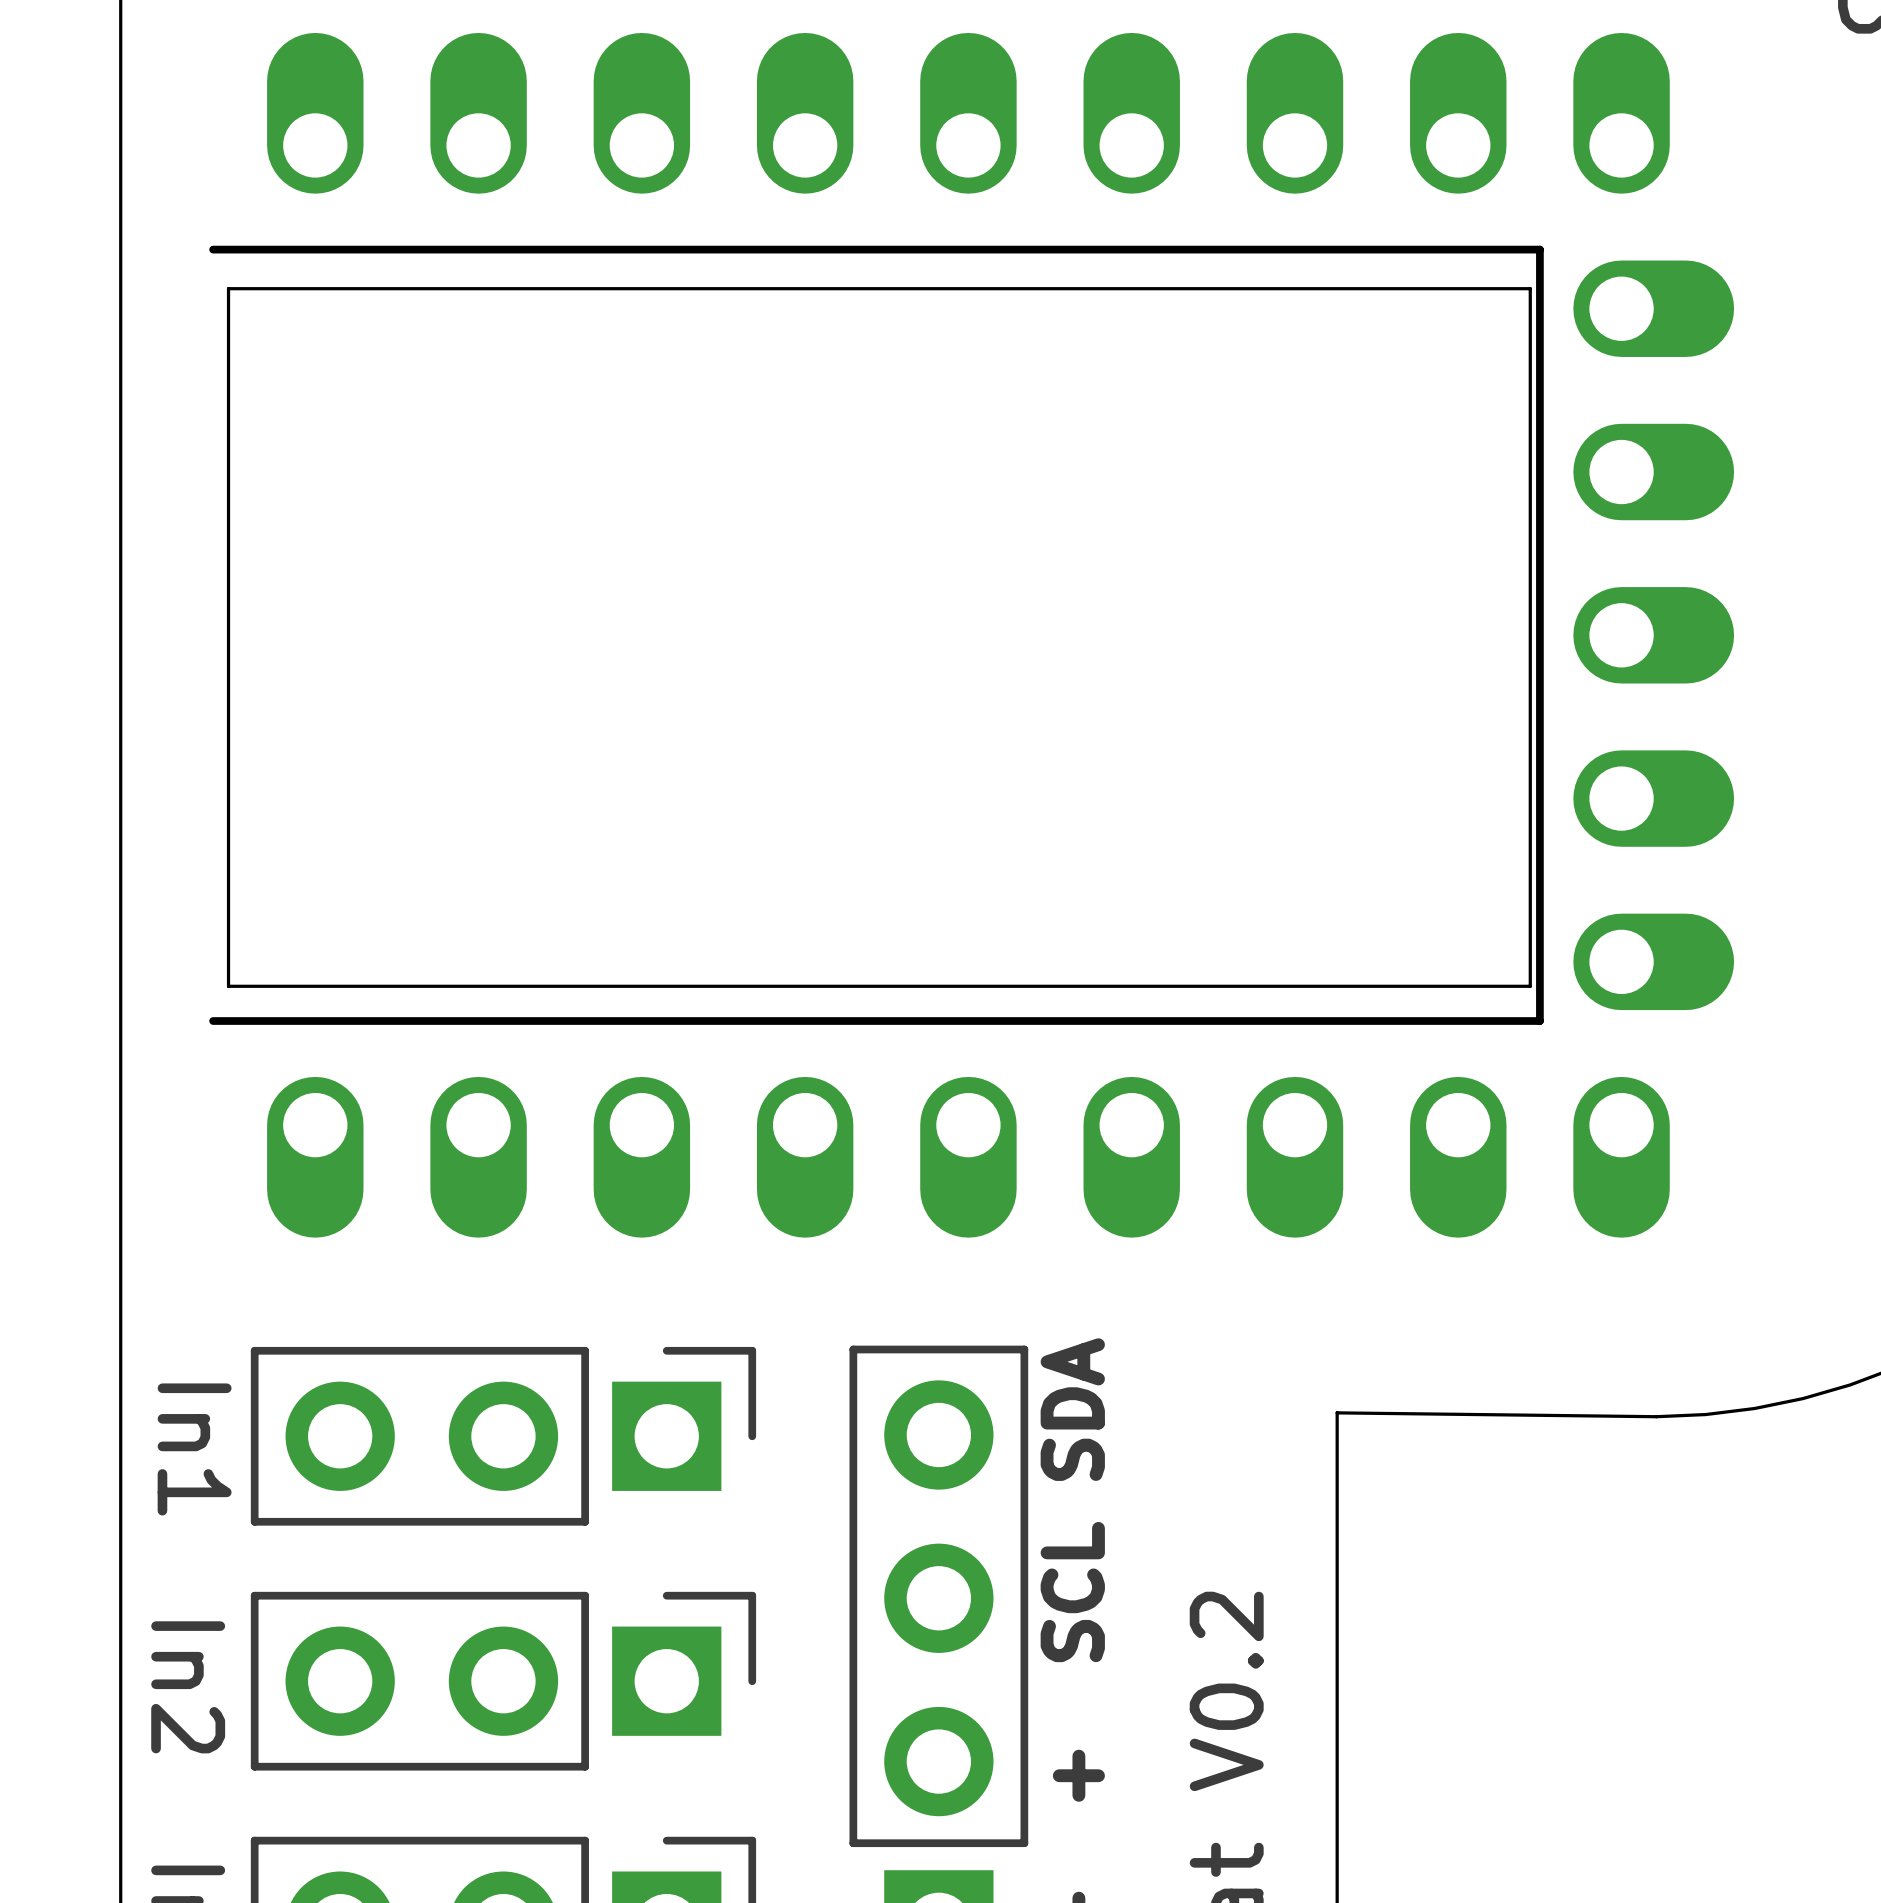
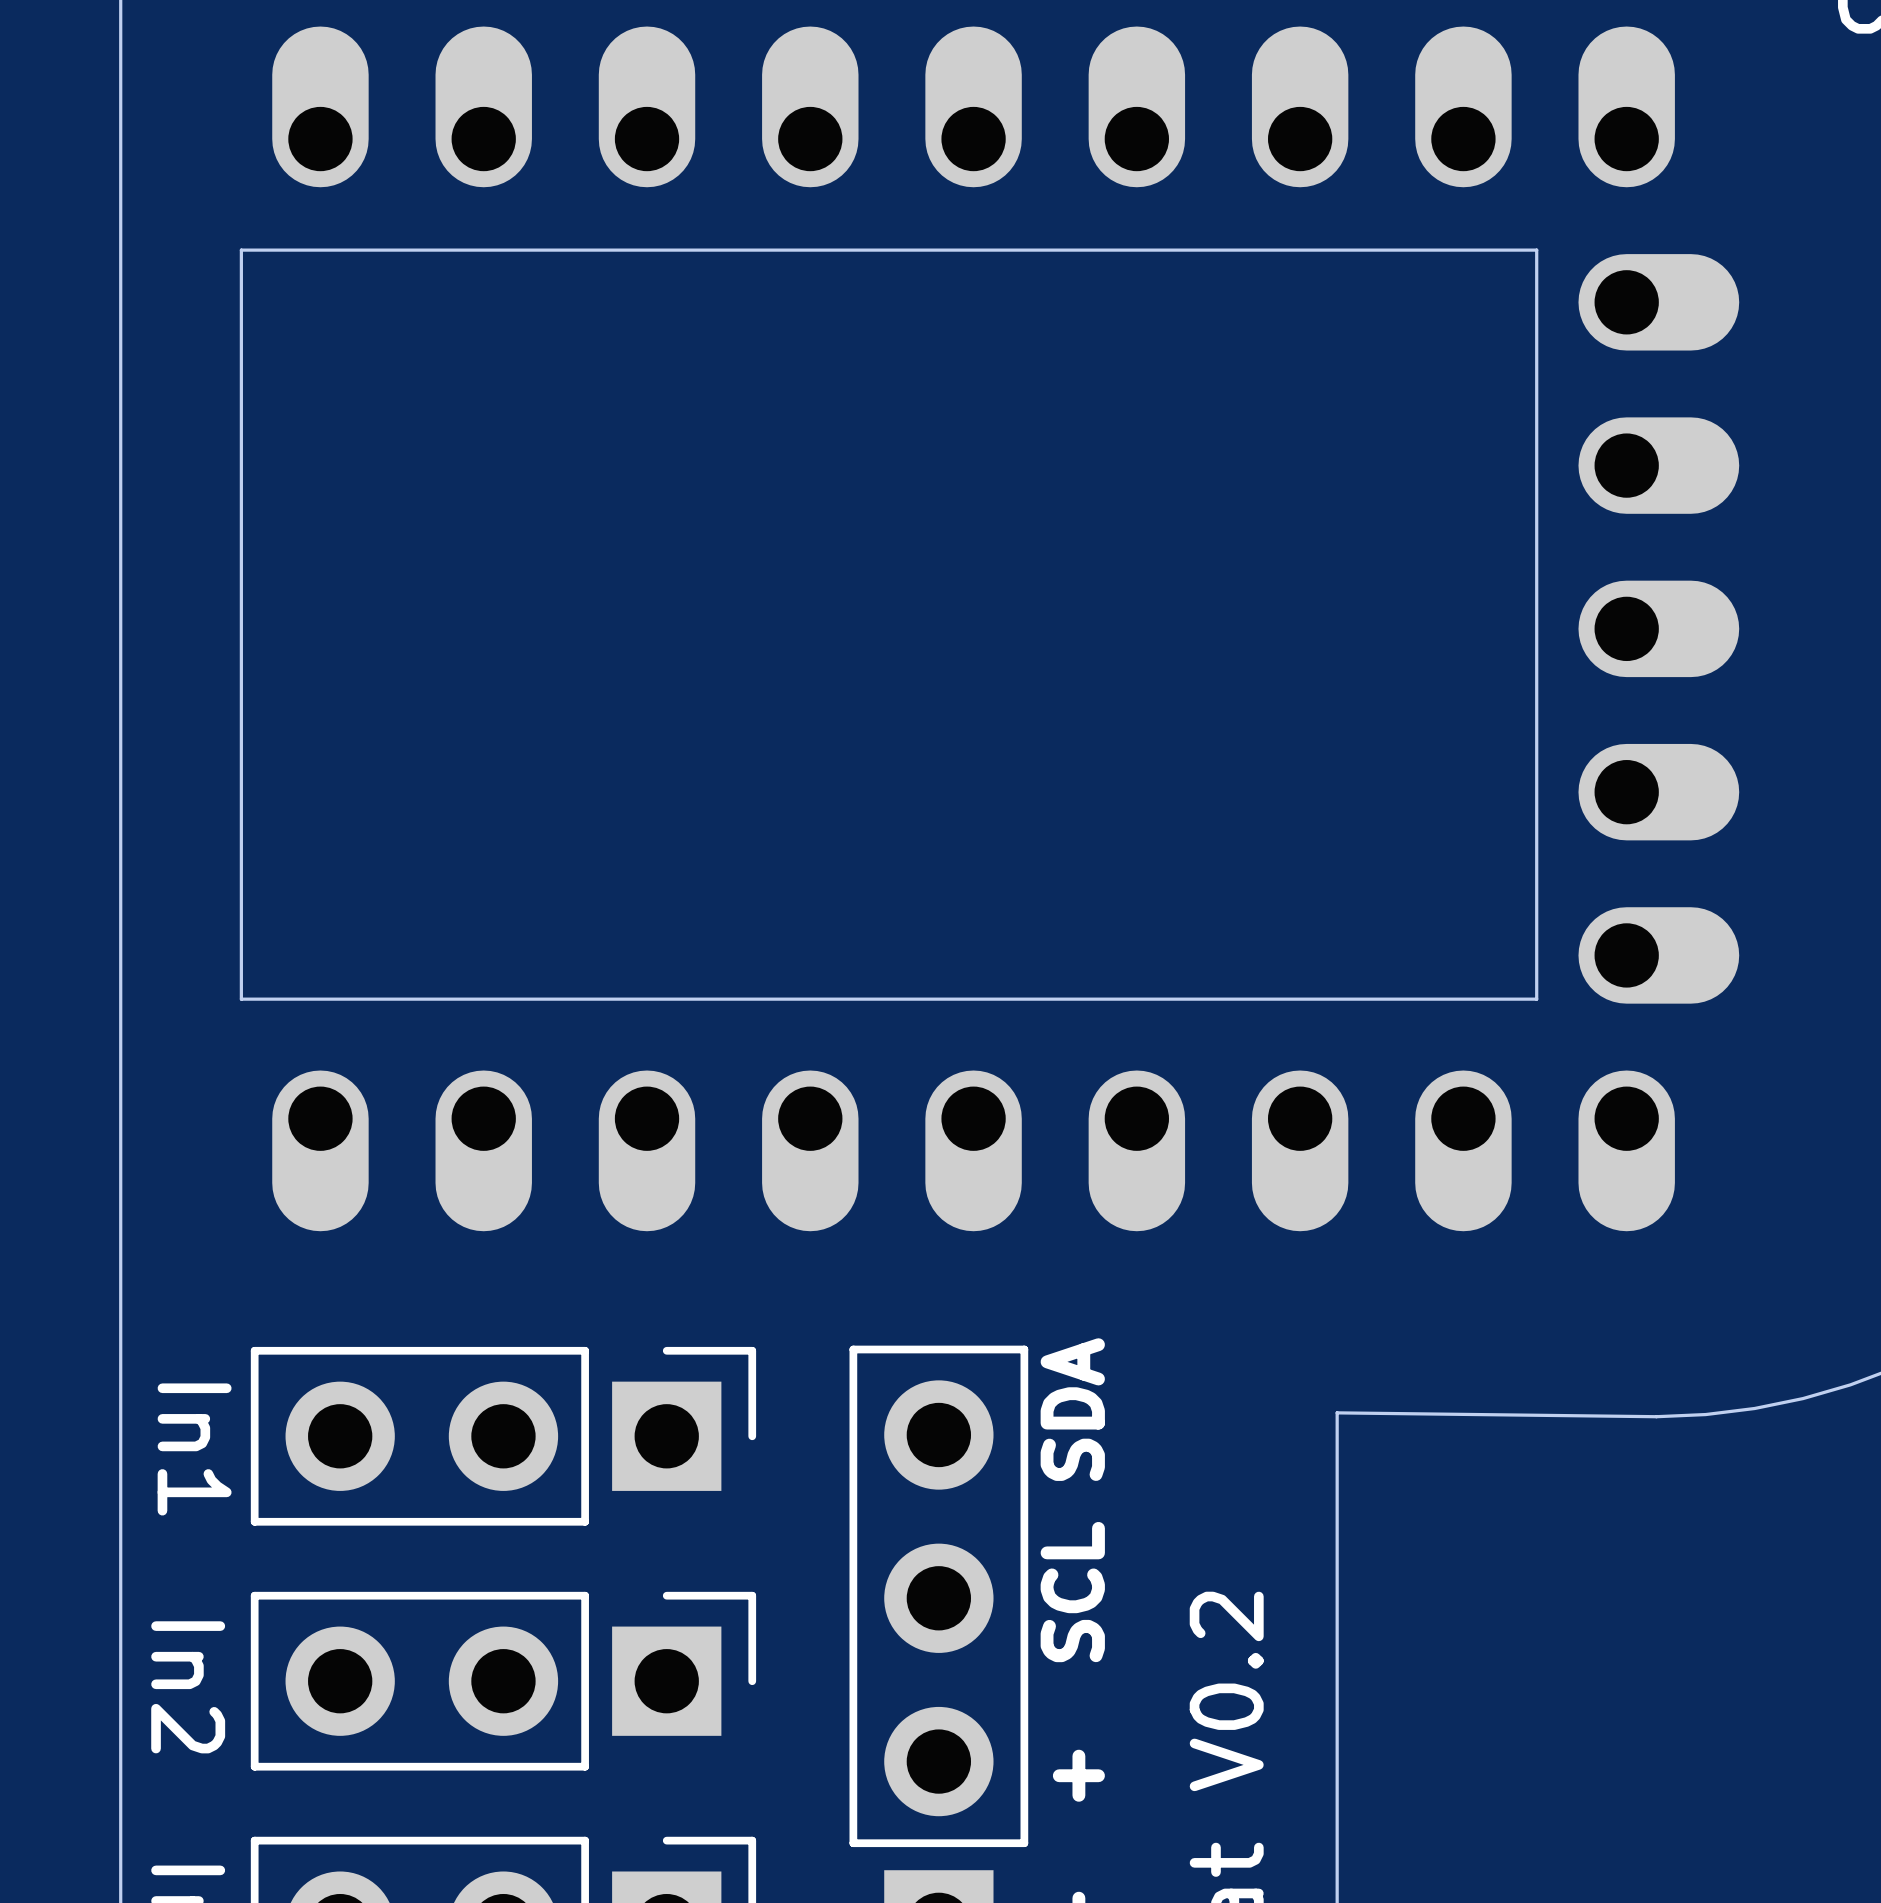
part footprint: [209, 32, 1735, 1238] -> [272, 26, 1740, 1232]
board edge: (228, 288) (1530, 288) (1530, 986) (228, 986) (228, 288) -> (241, 250) (241, 999) (1536, 999) (1536, 250) (241, 250)

